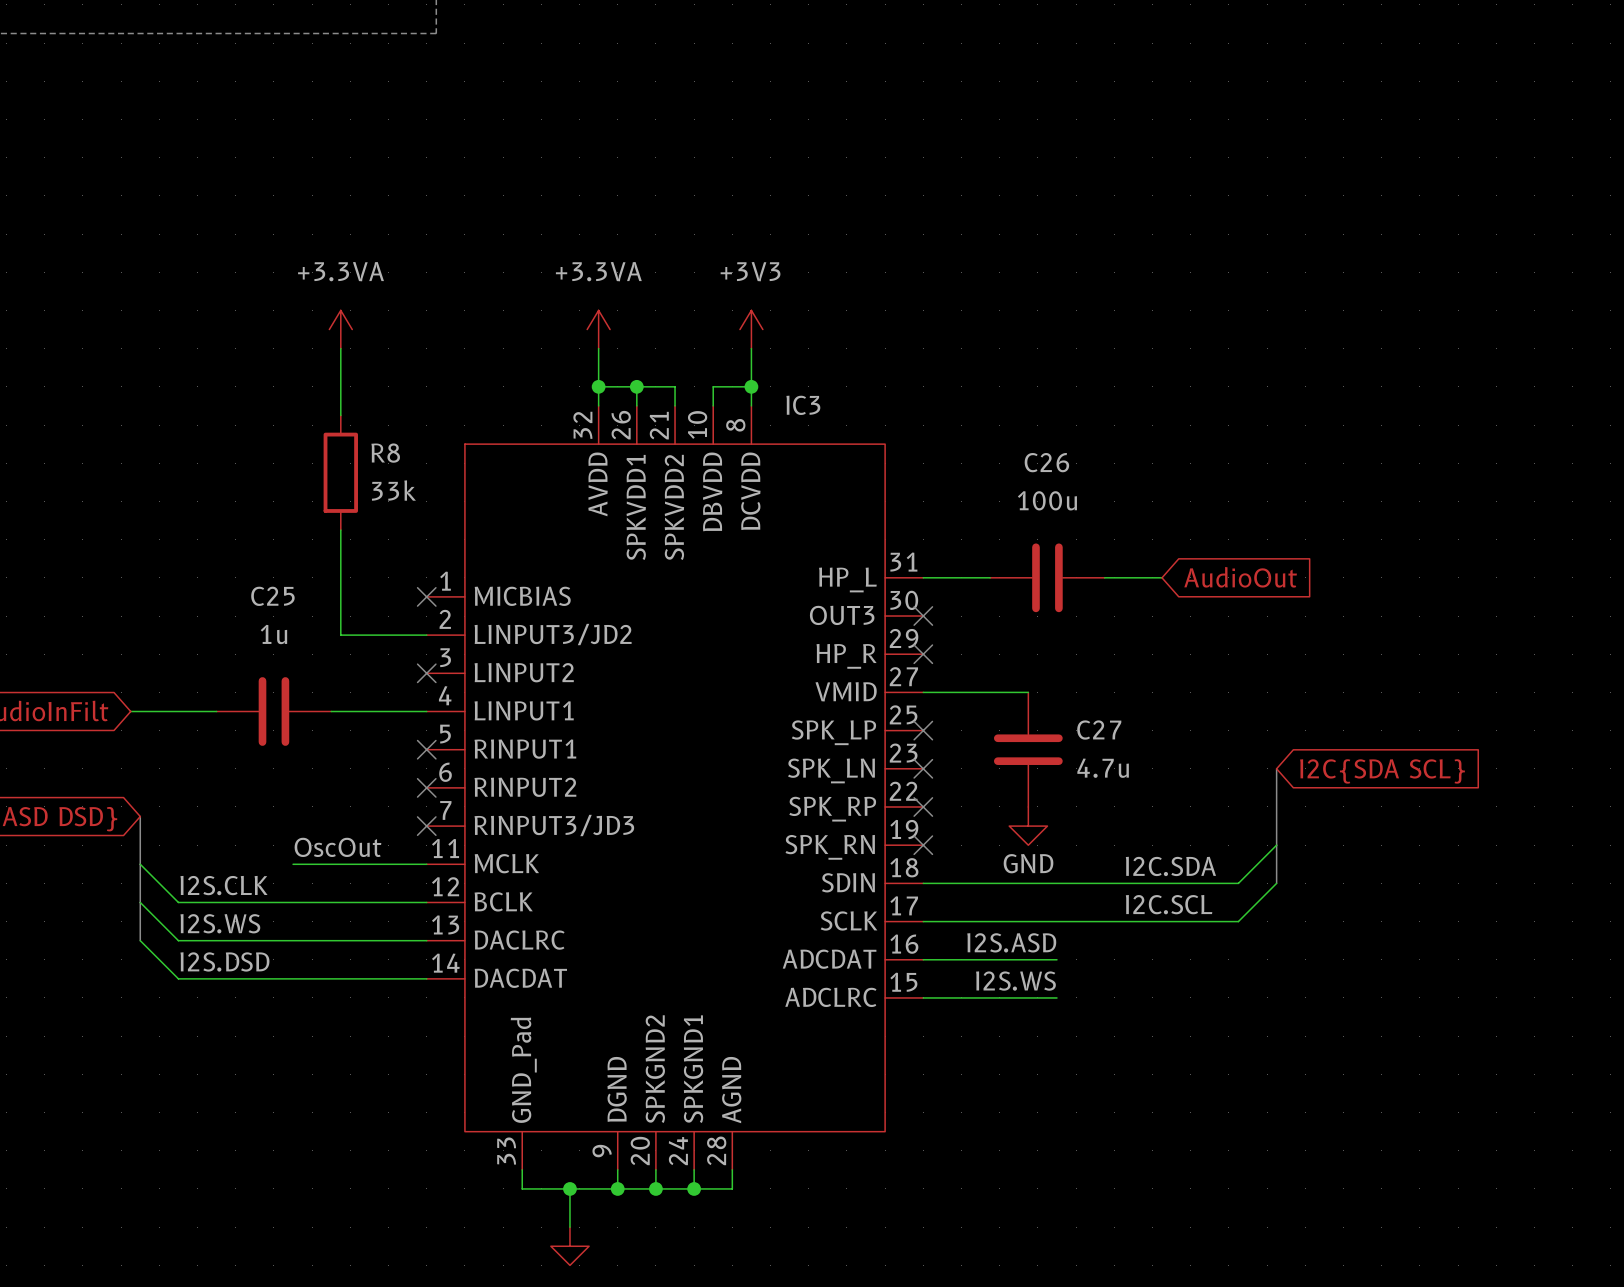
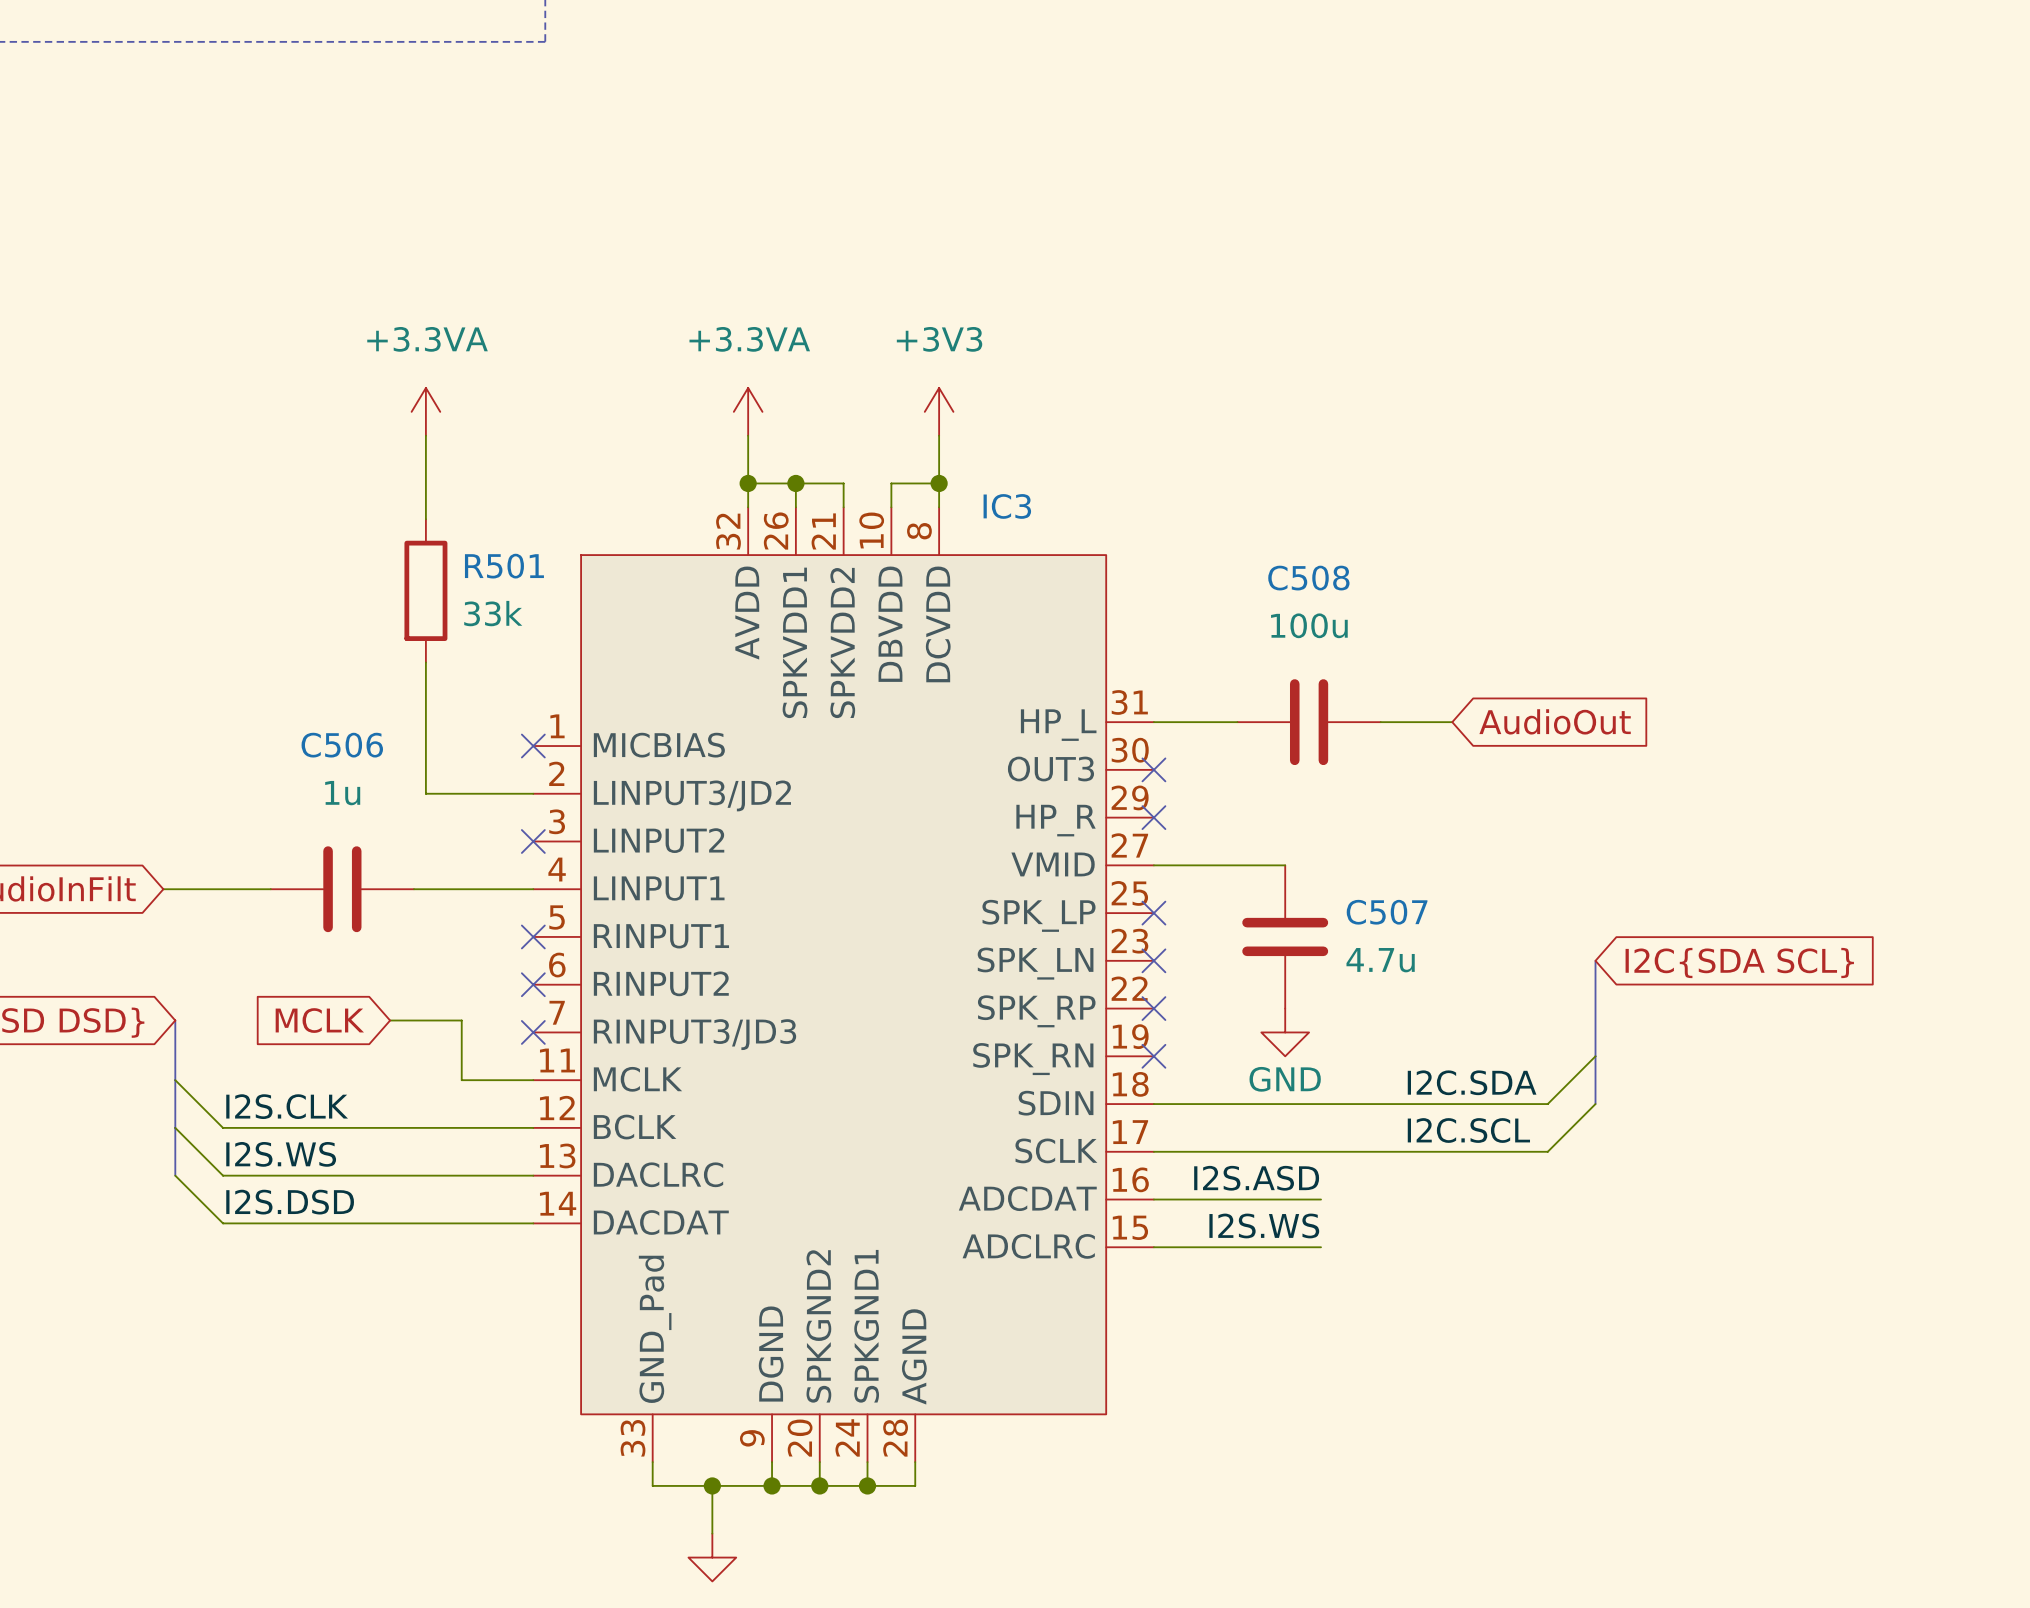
R8 name: R8 (385, 453) -> R501 (504, 566)
C26 name: C26 (1046, 462) -> C508 (1308, 578)
C25 name: C25 (272, 596) -> C506 (342, 745)
C27 name: C27 (1099, 730) -> C507 (1387, 912)
global label: none -> MCLK (319, 1020)
label: OscOut (337, 847) -> none
wire: (293, 864) (369, 864) -> (390, 1020) (461, 1020) (461, 1080)

